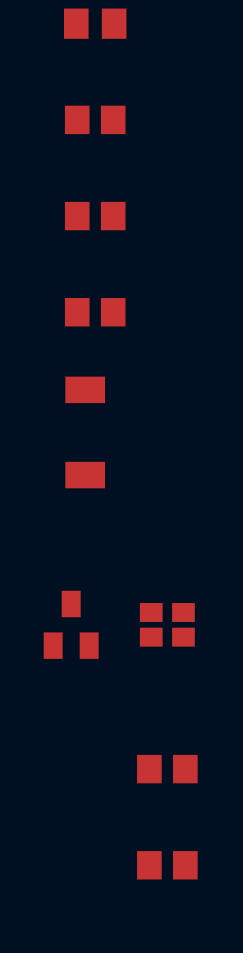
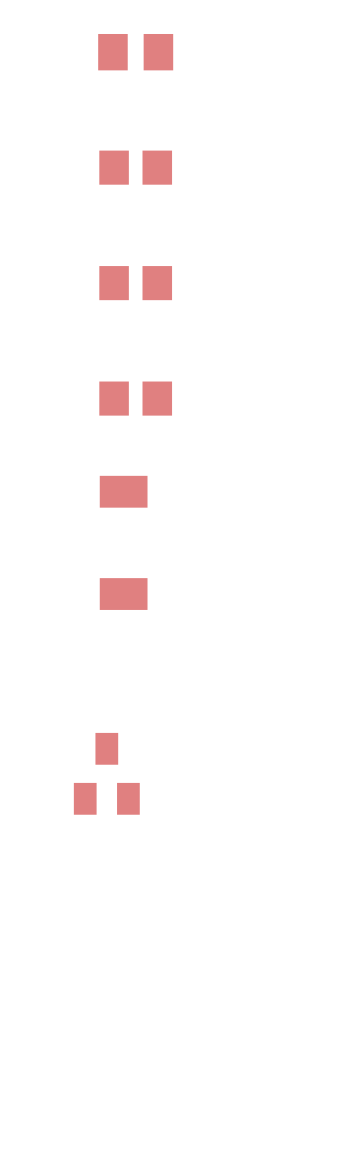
part: (167, 624) -> none
part: (167, 769) -> none
part: (167, 865) -> none

